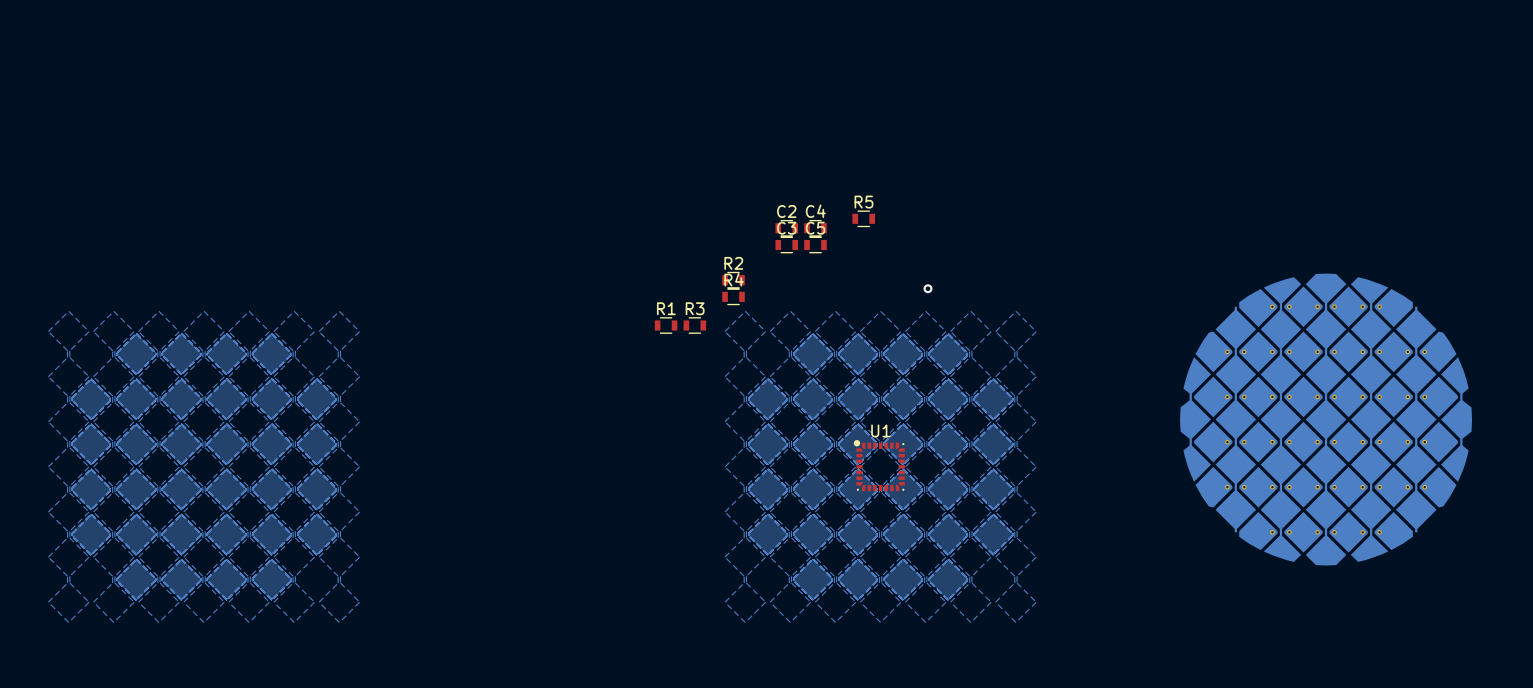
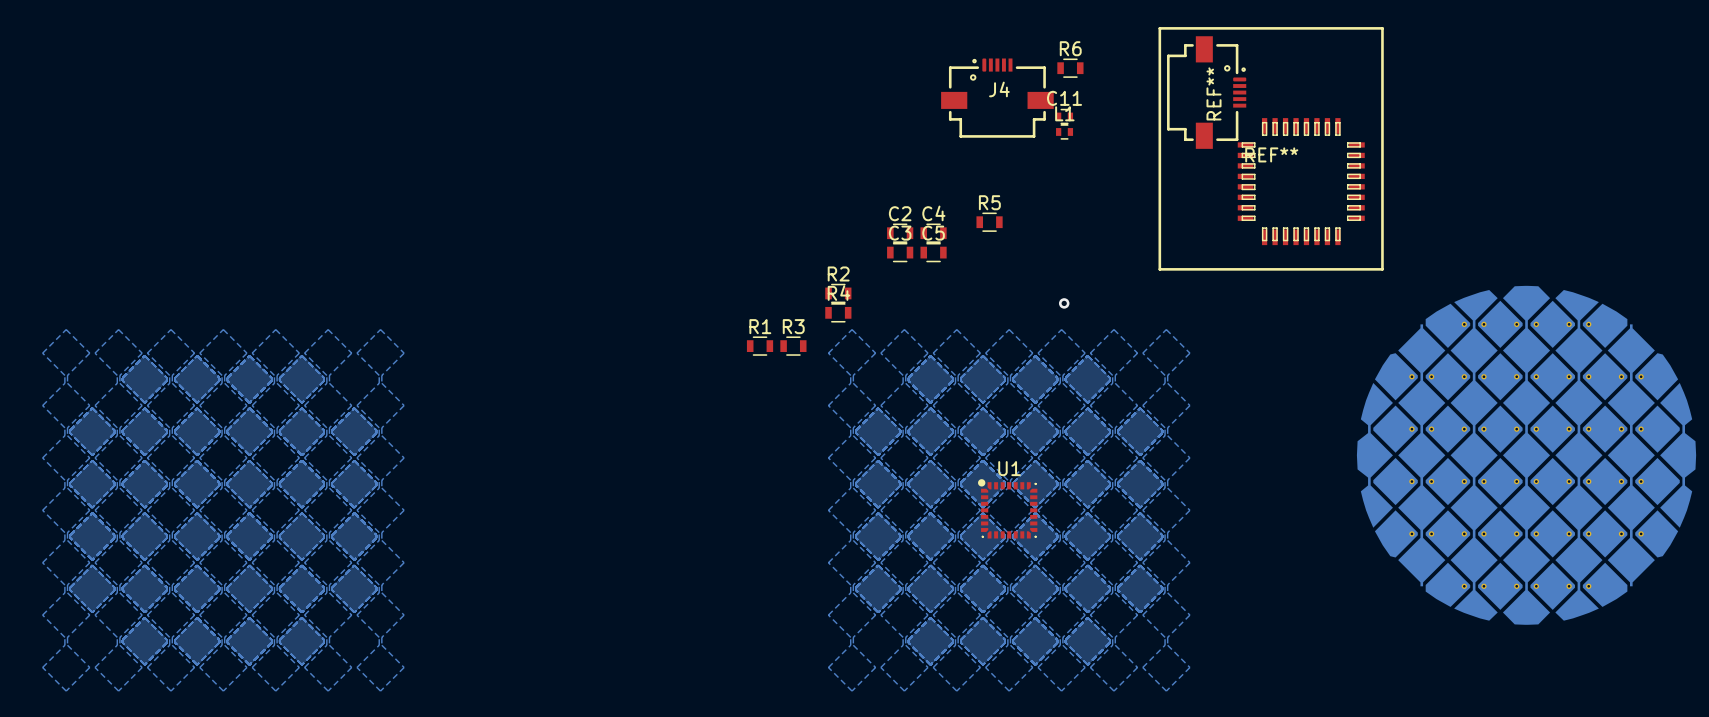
R6: none -> (1070, 68)
REF**: none -> (1206, 92)
J4: none -> (997, 98)
C11: none -> (1064, 116)
L1: none -> (1064, 131)
REF**: none -> (1271, 148)
part: none -> (1301, 181)

